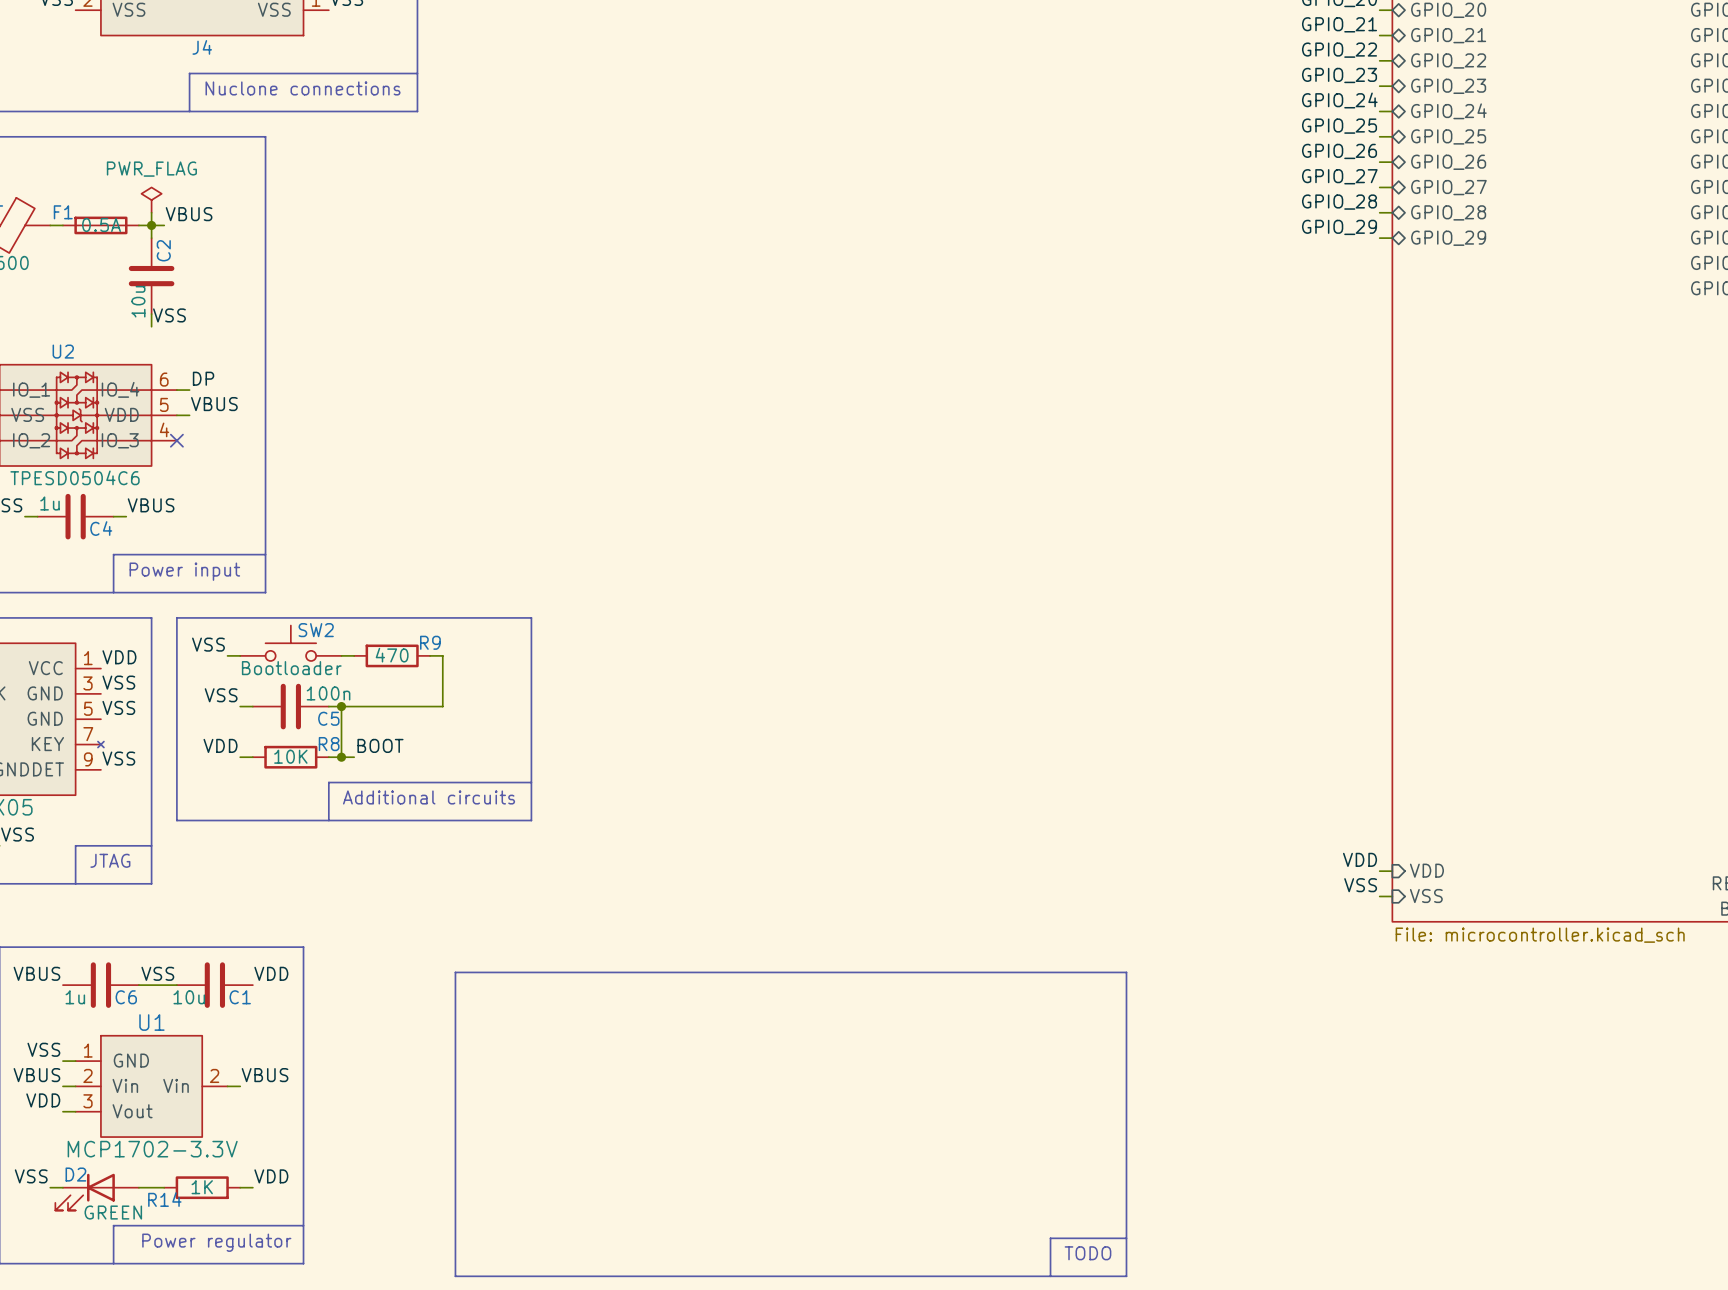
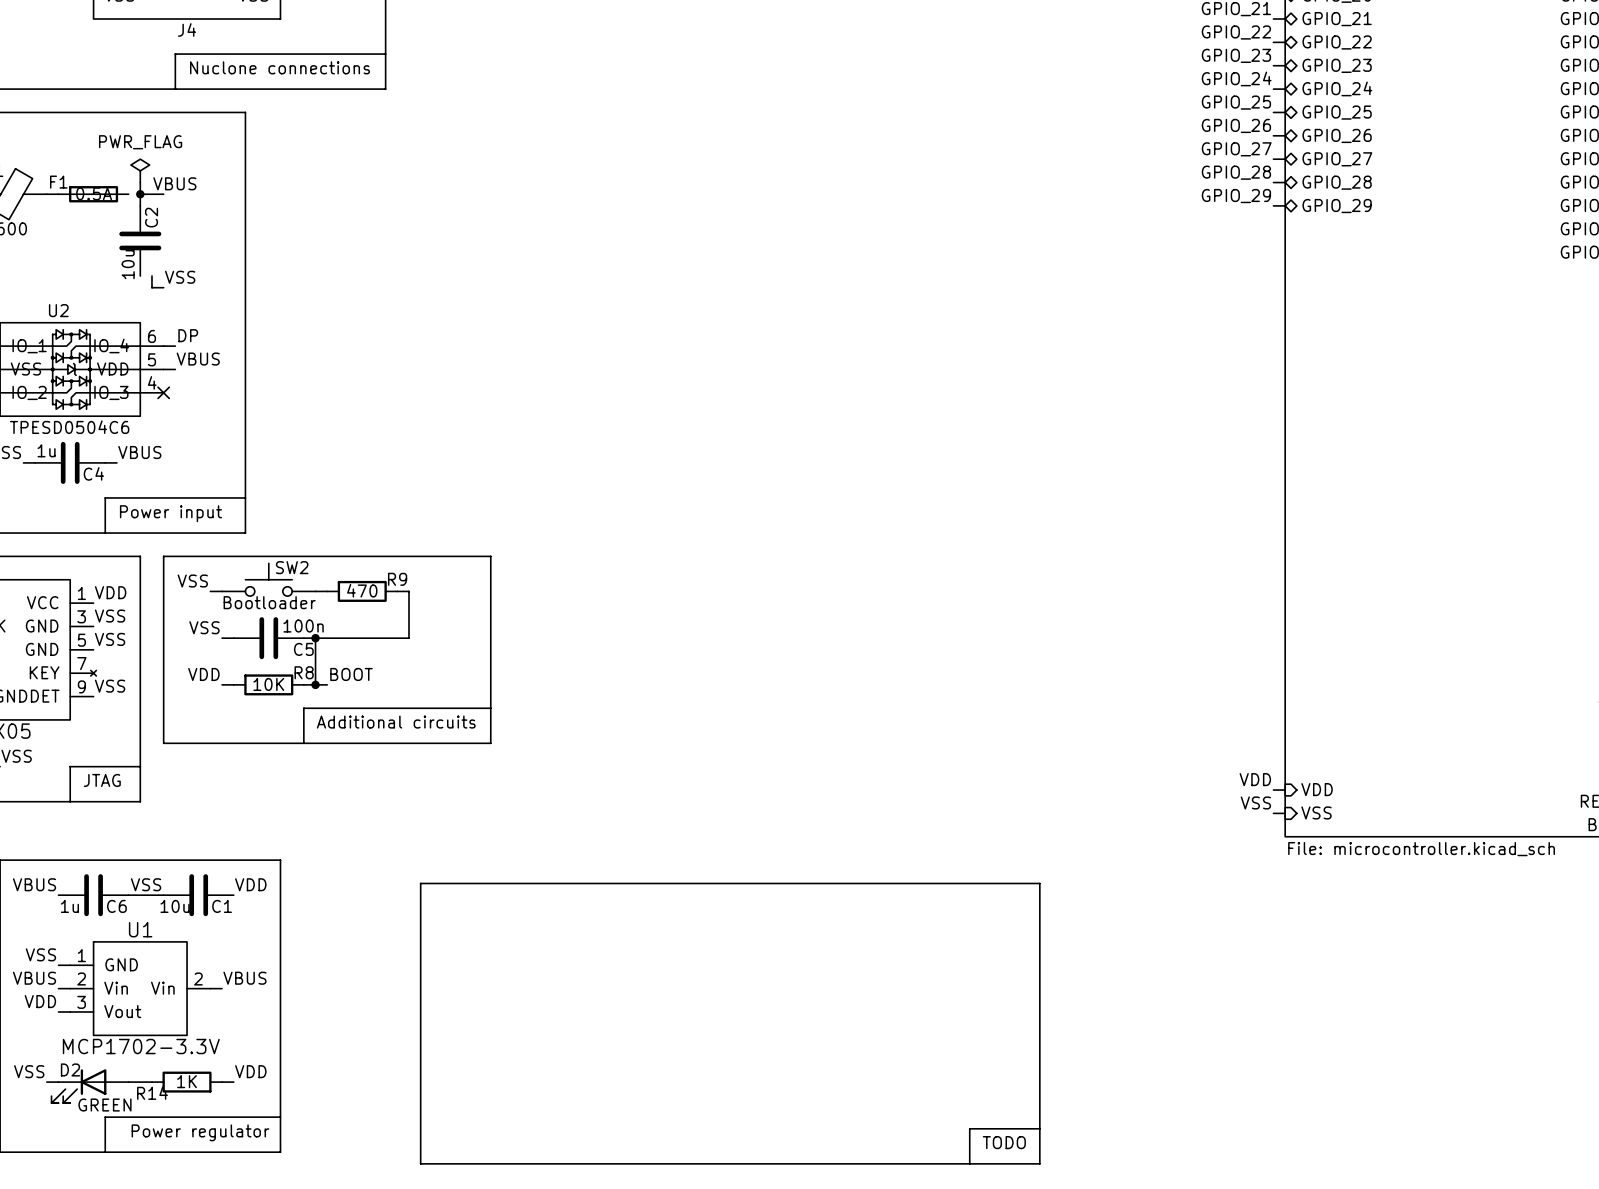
wire: (138, 225) (151, 225) -> (151, 194) (163, 194)
wire: (151, 314) (151, 326) -> none
wire: none -> (151, 276) (151, 287) (163, 287)
label position: VSS (169, 315) -> VSS (180, 277)

